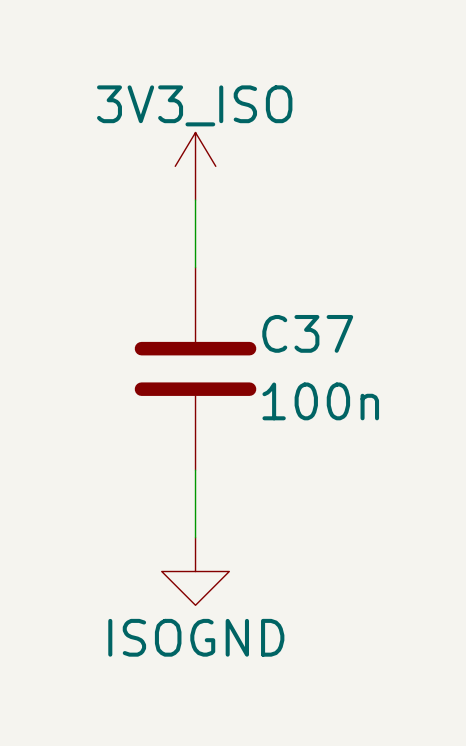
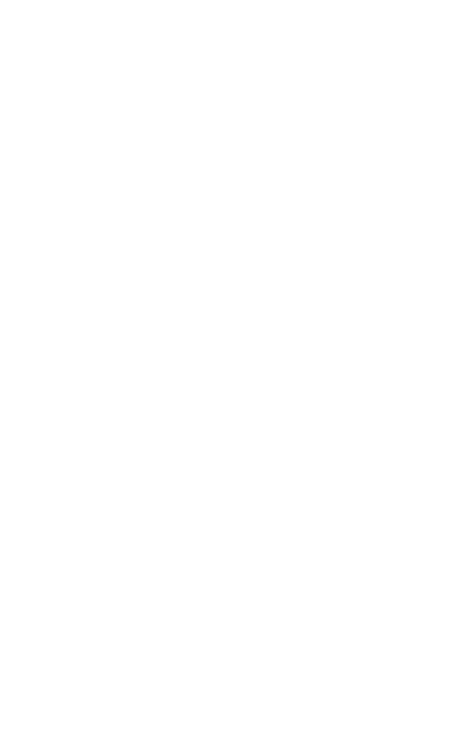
power symbol: 3V3_ISO (195, 166) -> none
wire: (195, 200) (195, 267) -> none
C37: 100n (195, 368) -> none
wire: (195, 470) (195, 537) -> none
power symbol: ISOGND (195, 571) -> none

